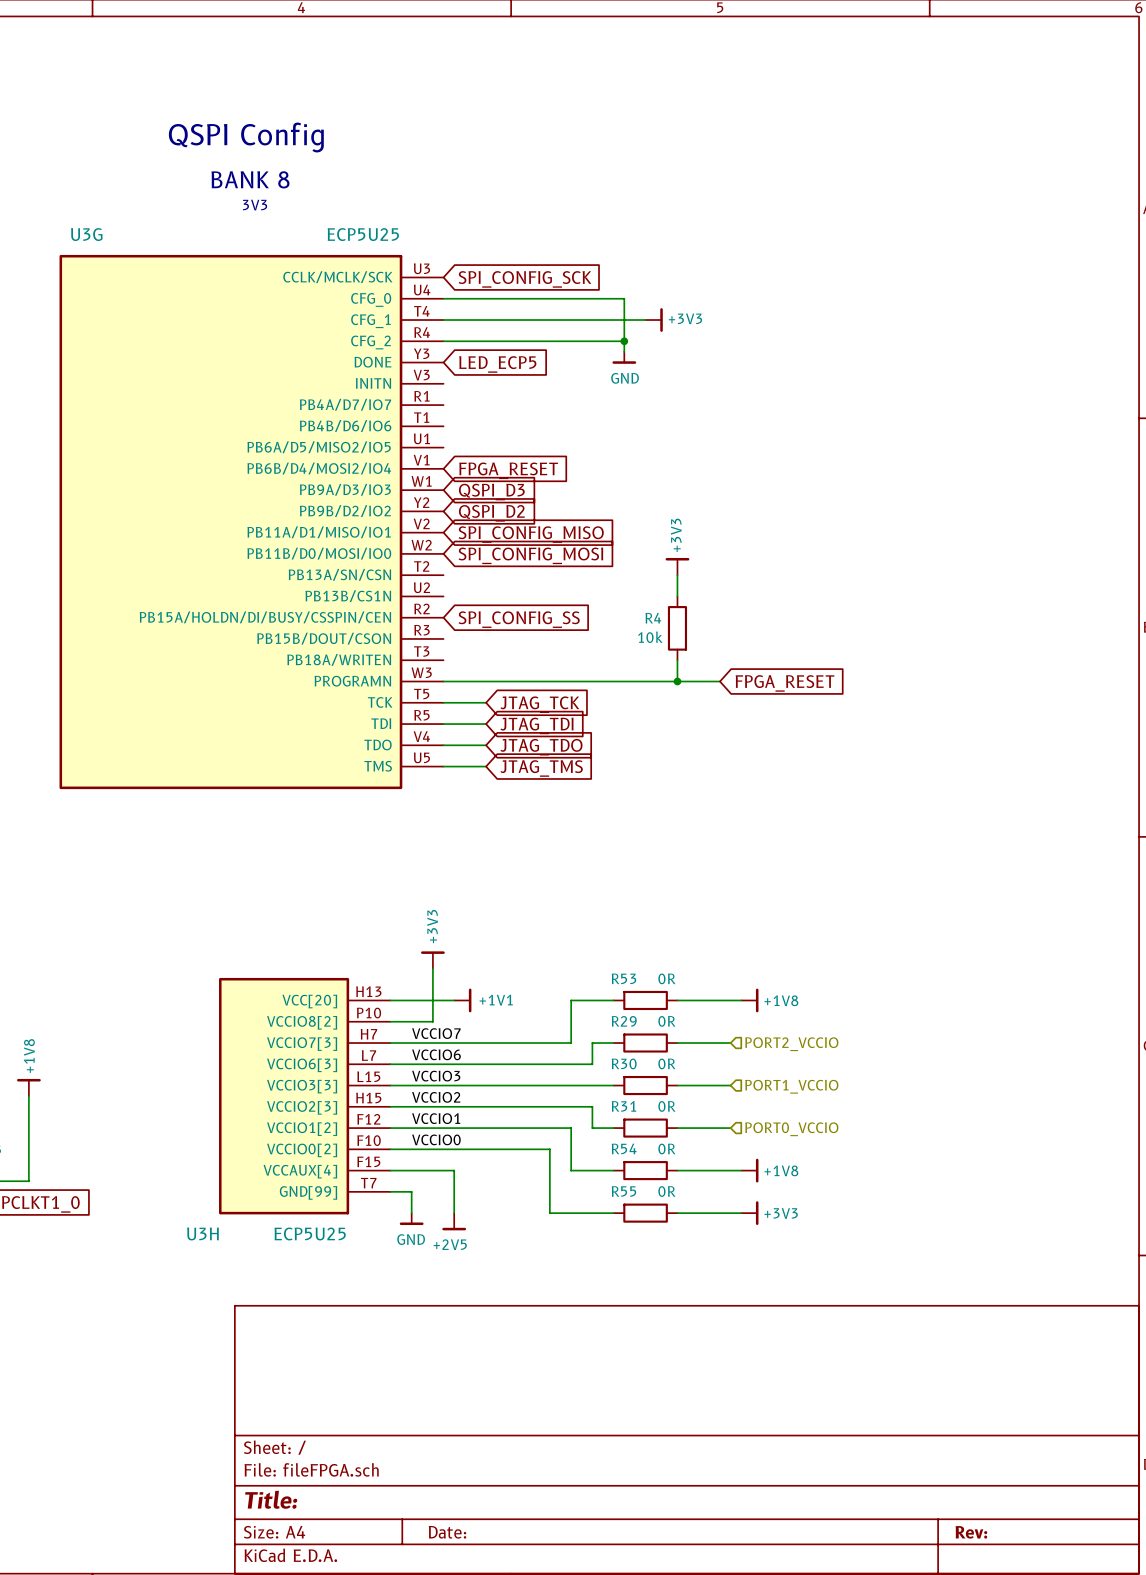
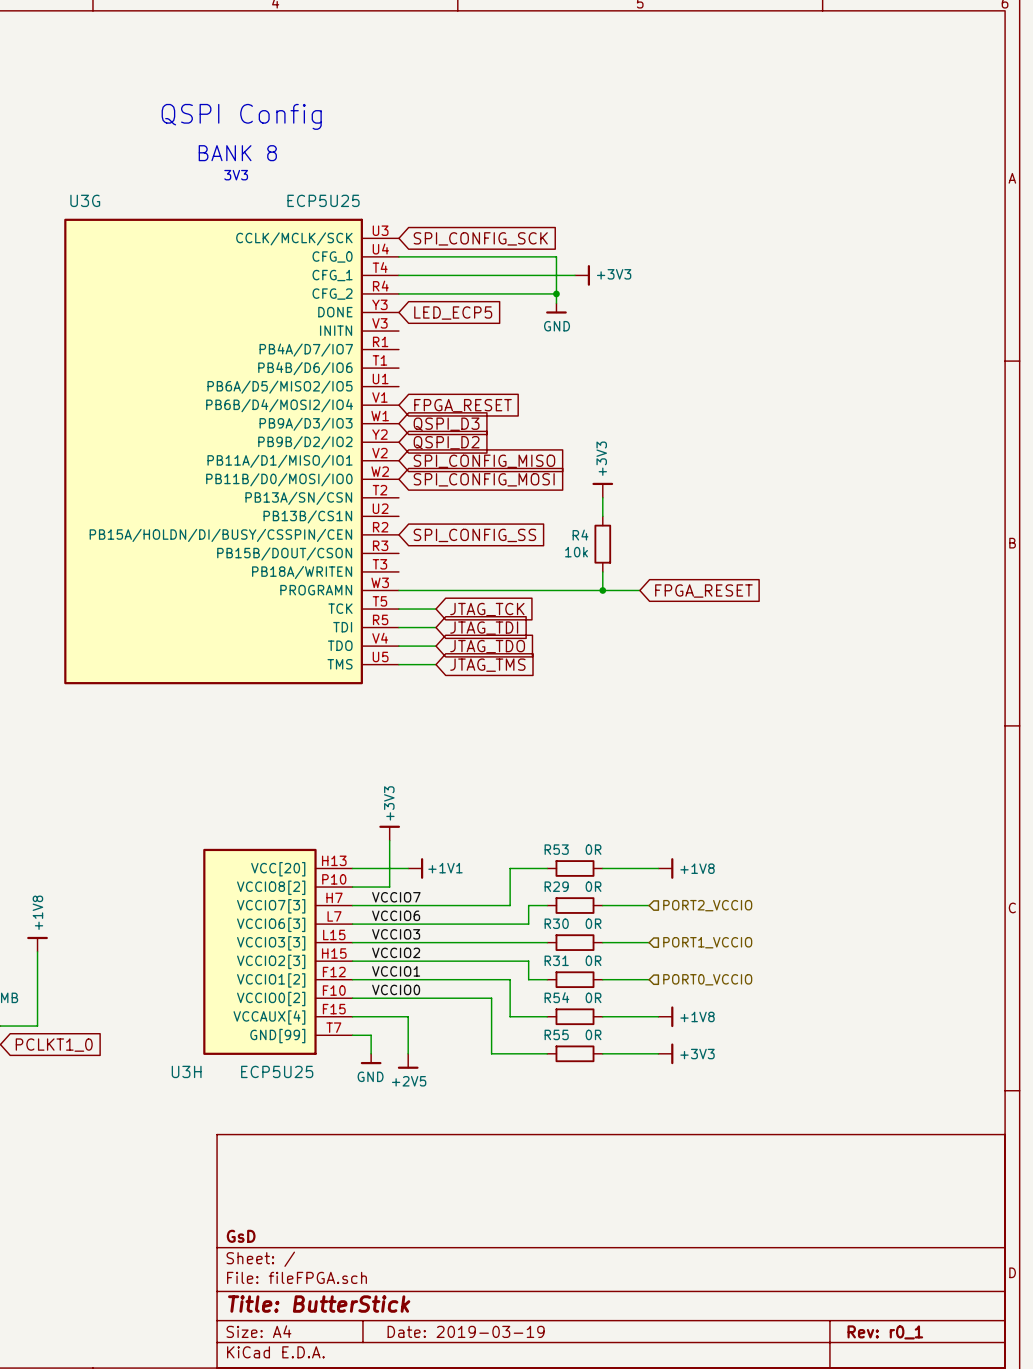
title block: none -> GsD (241, 1236)
title block: Title: (271, 1499) -> Title: ButterStick (319, 1304)
title block: Date: (447, 1532) -> Date: 2019-03-19 (466, 1331)
title block: Rev: (971, 1532) -> Rev: r0_1 (885, 1332)

